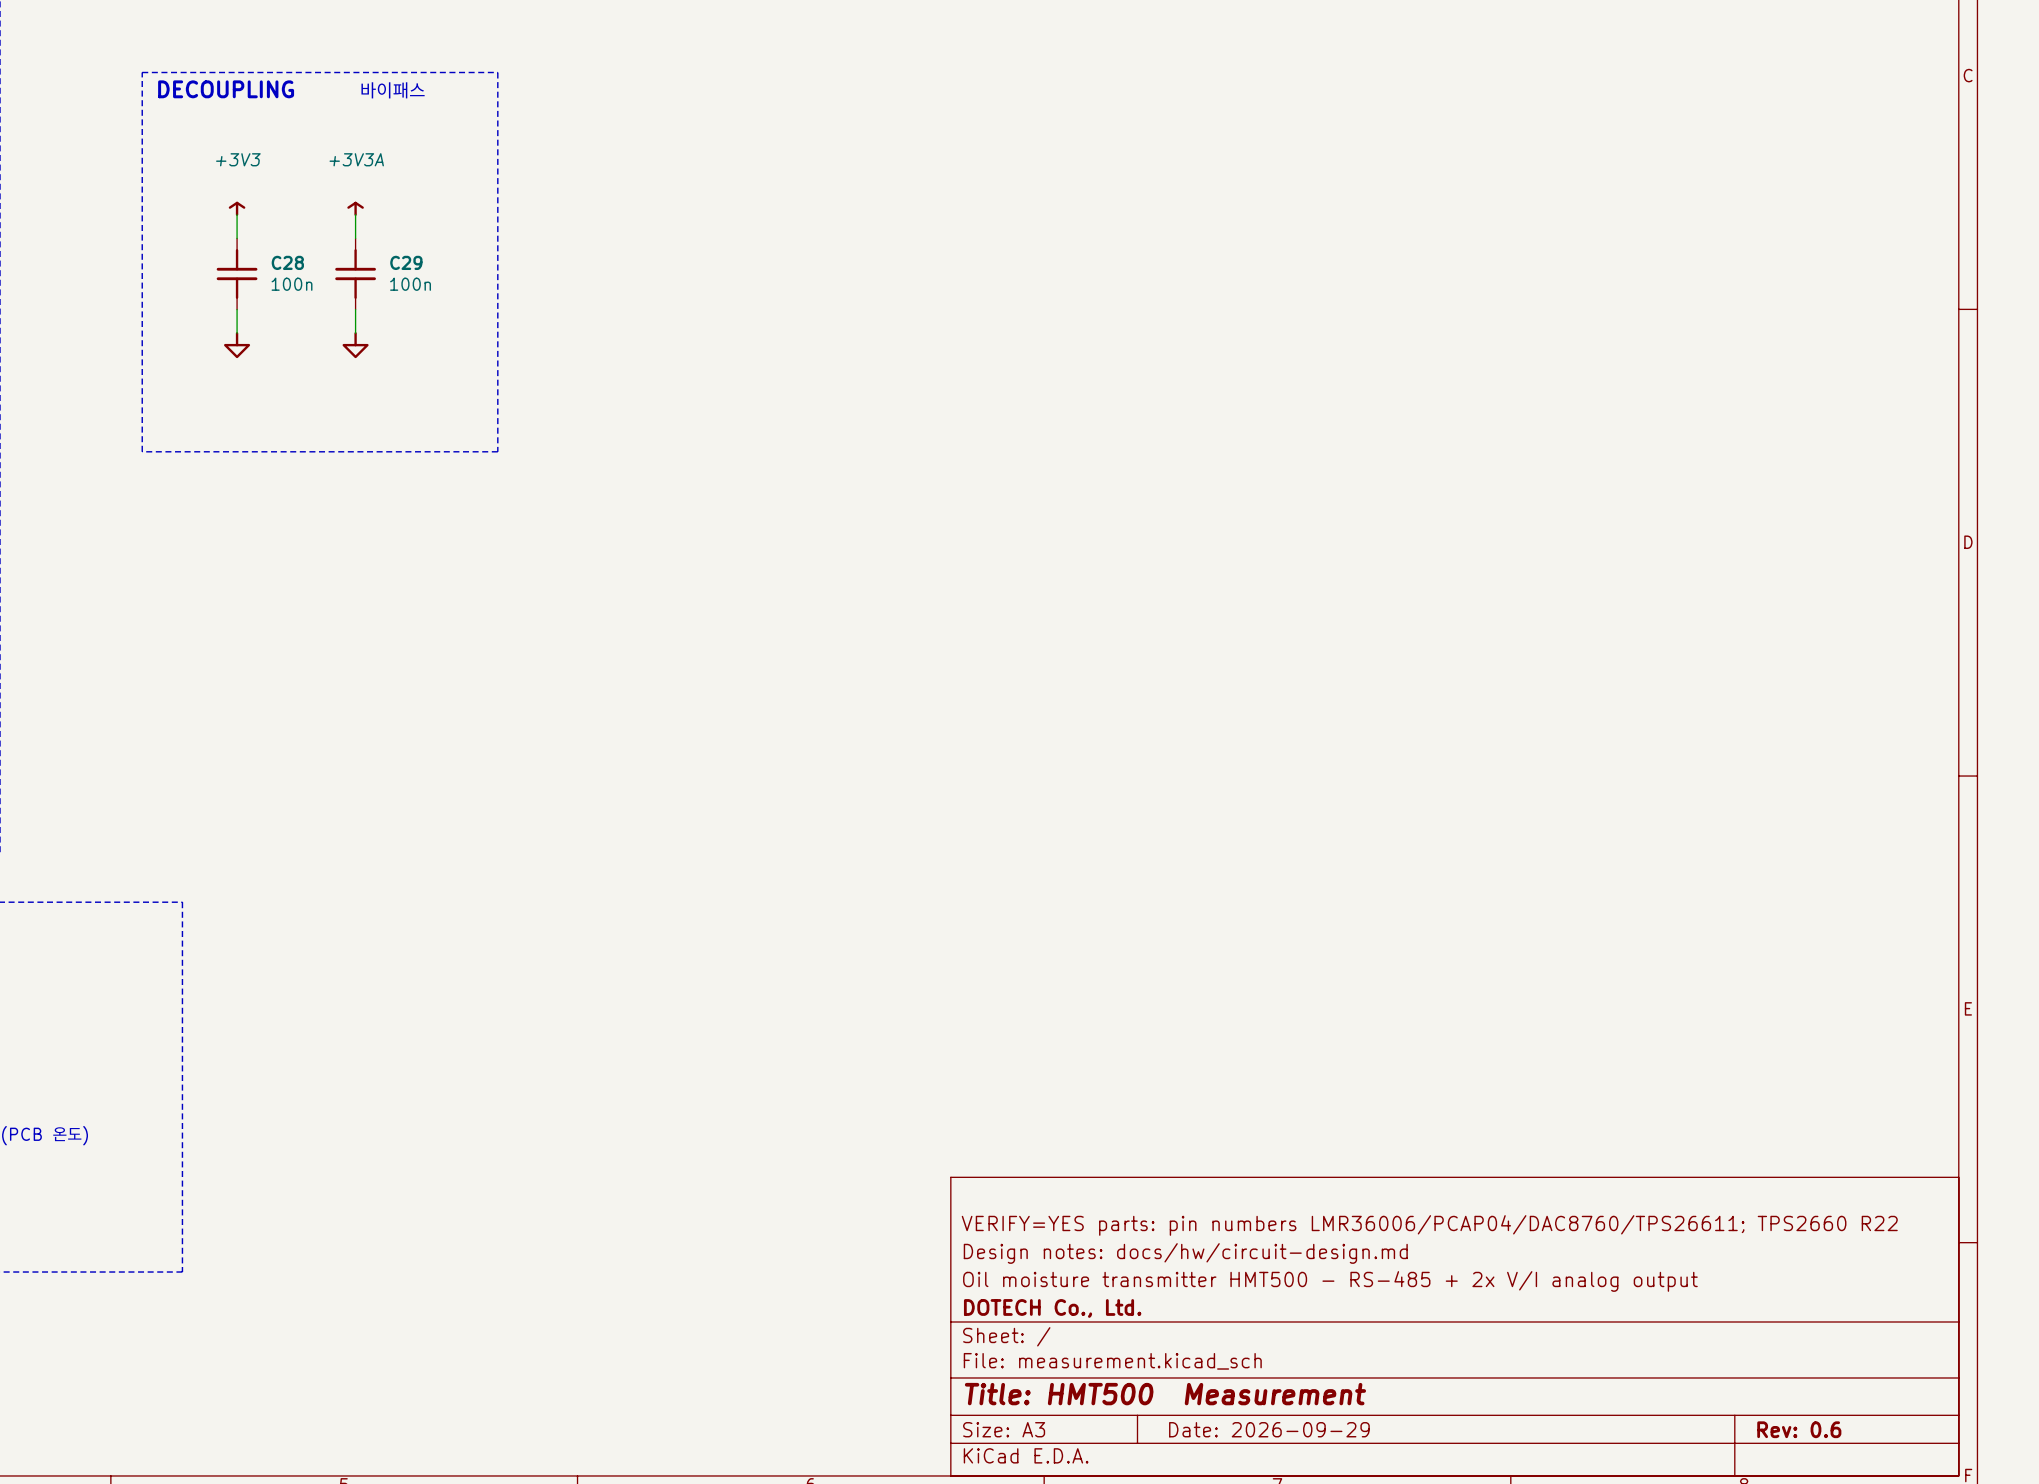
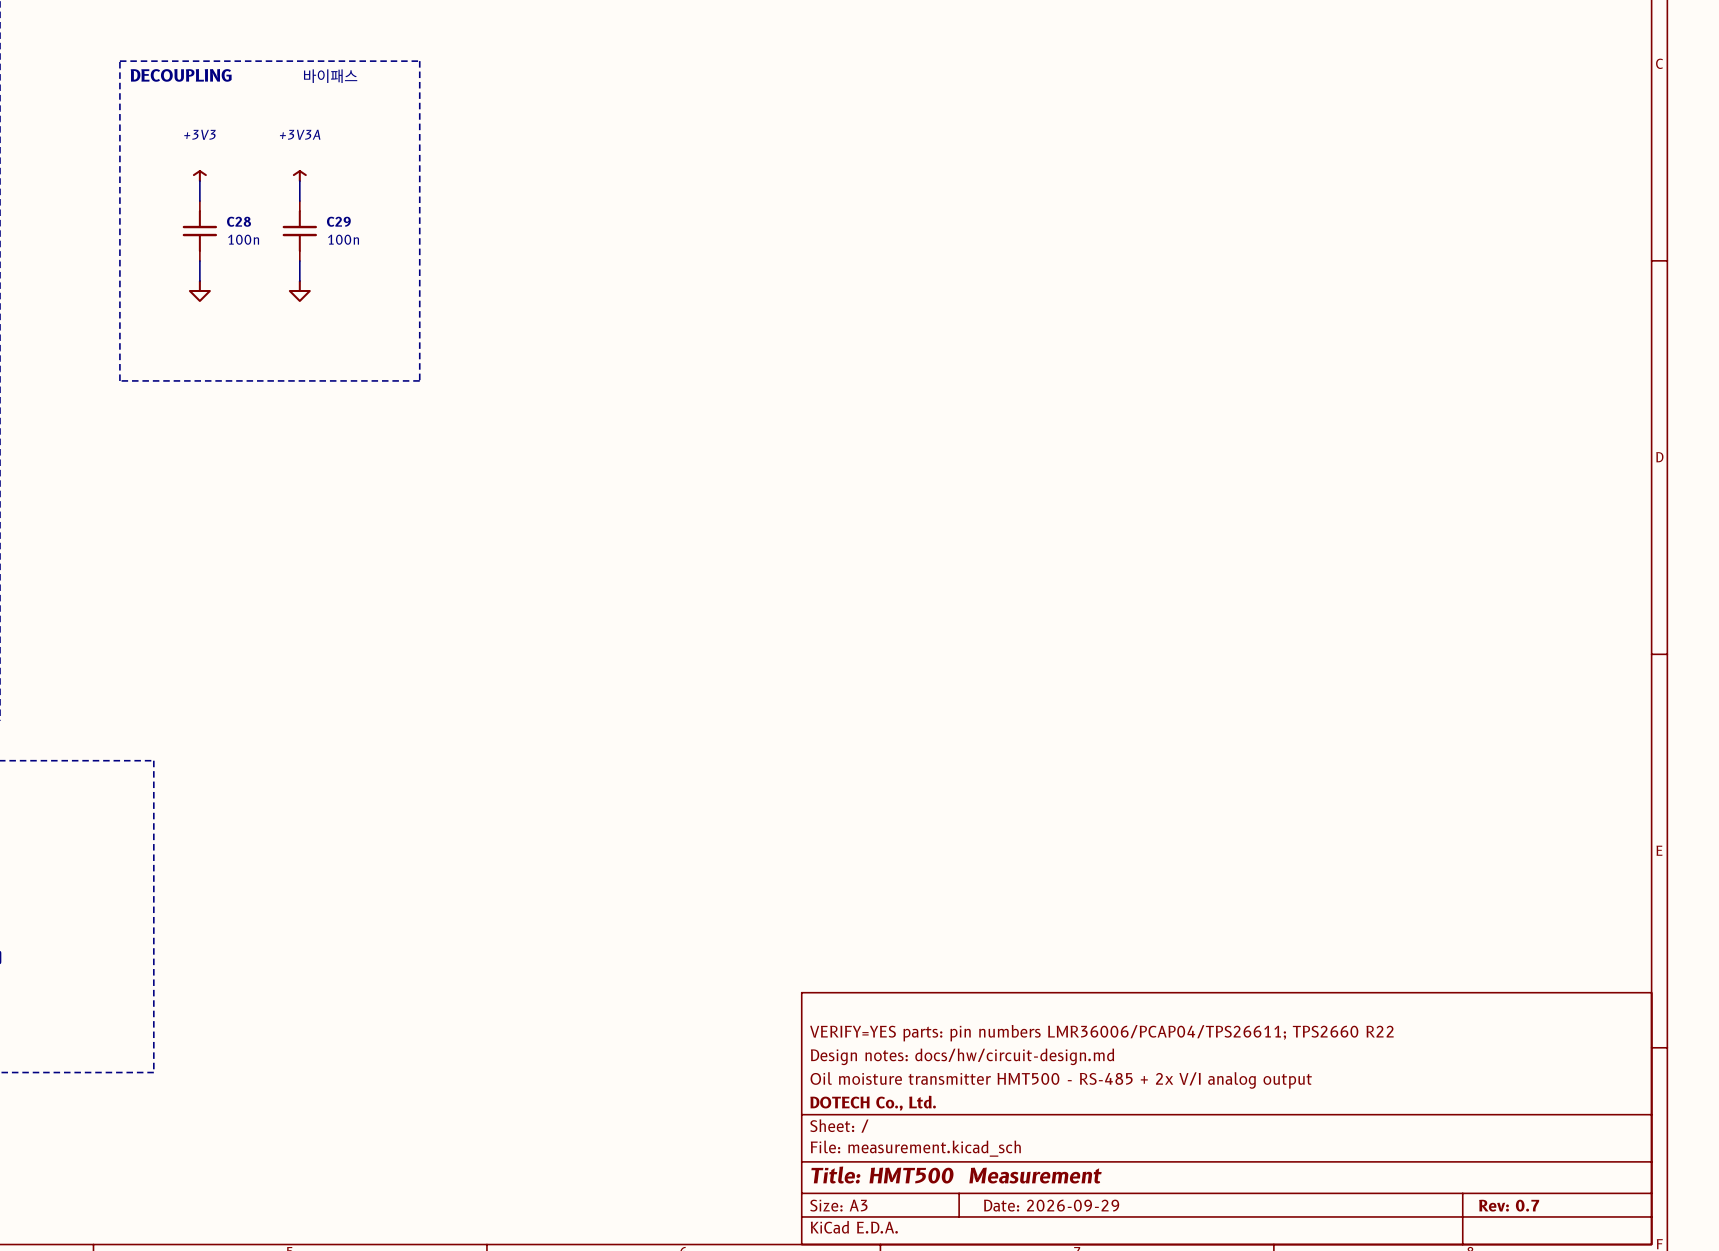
title block: VERIFY=YES parts: pin numbers LMR36006/PCAP04/DAC8760/TPS26611; TPS2660 R22 (1429, 1225) -> VERIFY=YES parts: pin numbers LMR36006/PCAP04/TPS26611; TPS2660 R22 (1101, 1033)
title block: Rev: 0.6 (1799, 1429) -> Rev: 0.7 (1509, 1205)

